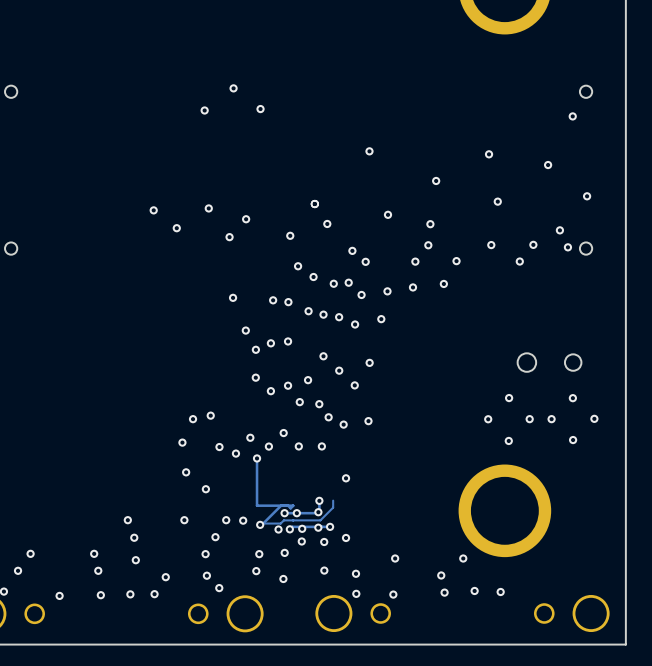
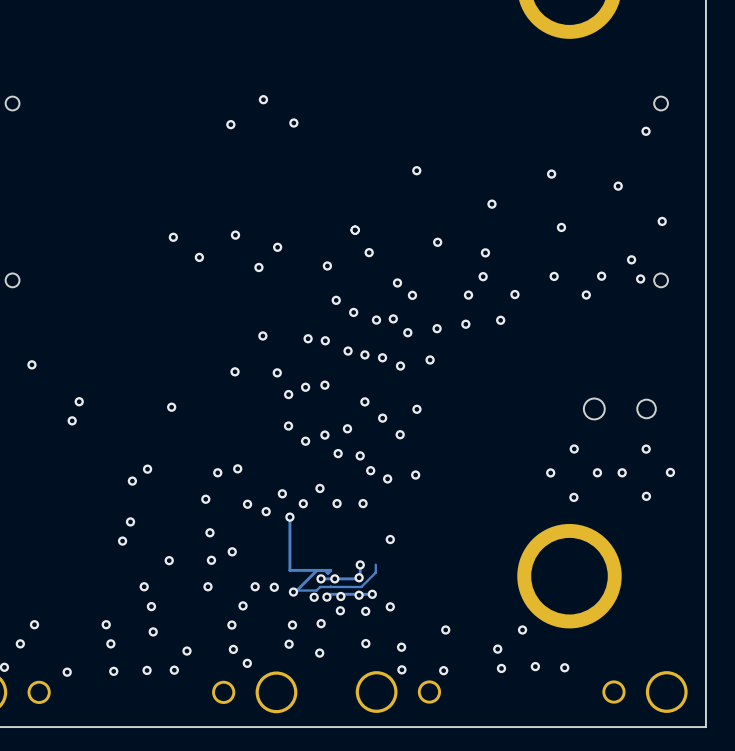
via: none -> (31, 364)
via: none -> (235, 371)
via: none -> (79, 401)
via: none -> (171, 407)
via: none -> (72, 420)
via: none -> (147, 469)
via: none -> (132, 481)
via: none -> (130, 521)
via: none -> (122, 541)
via: none -> (211, 560)
via: none -> (169, 560)

